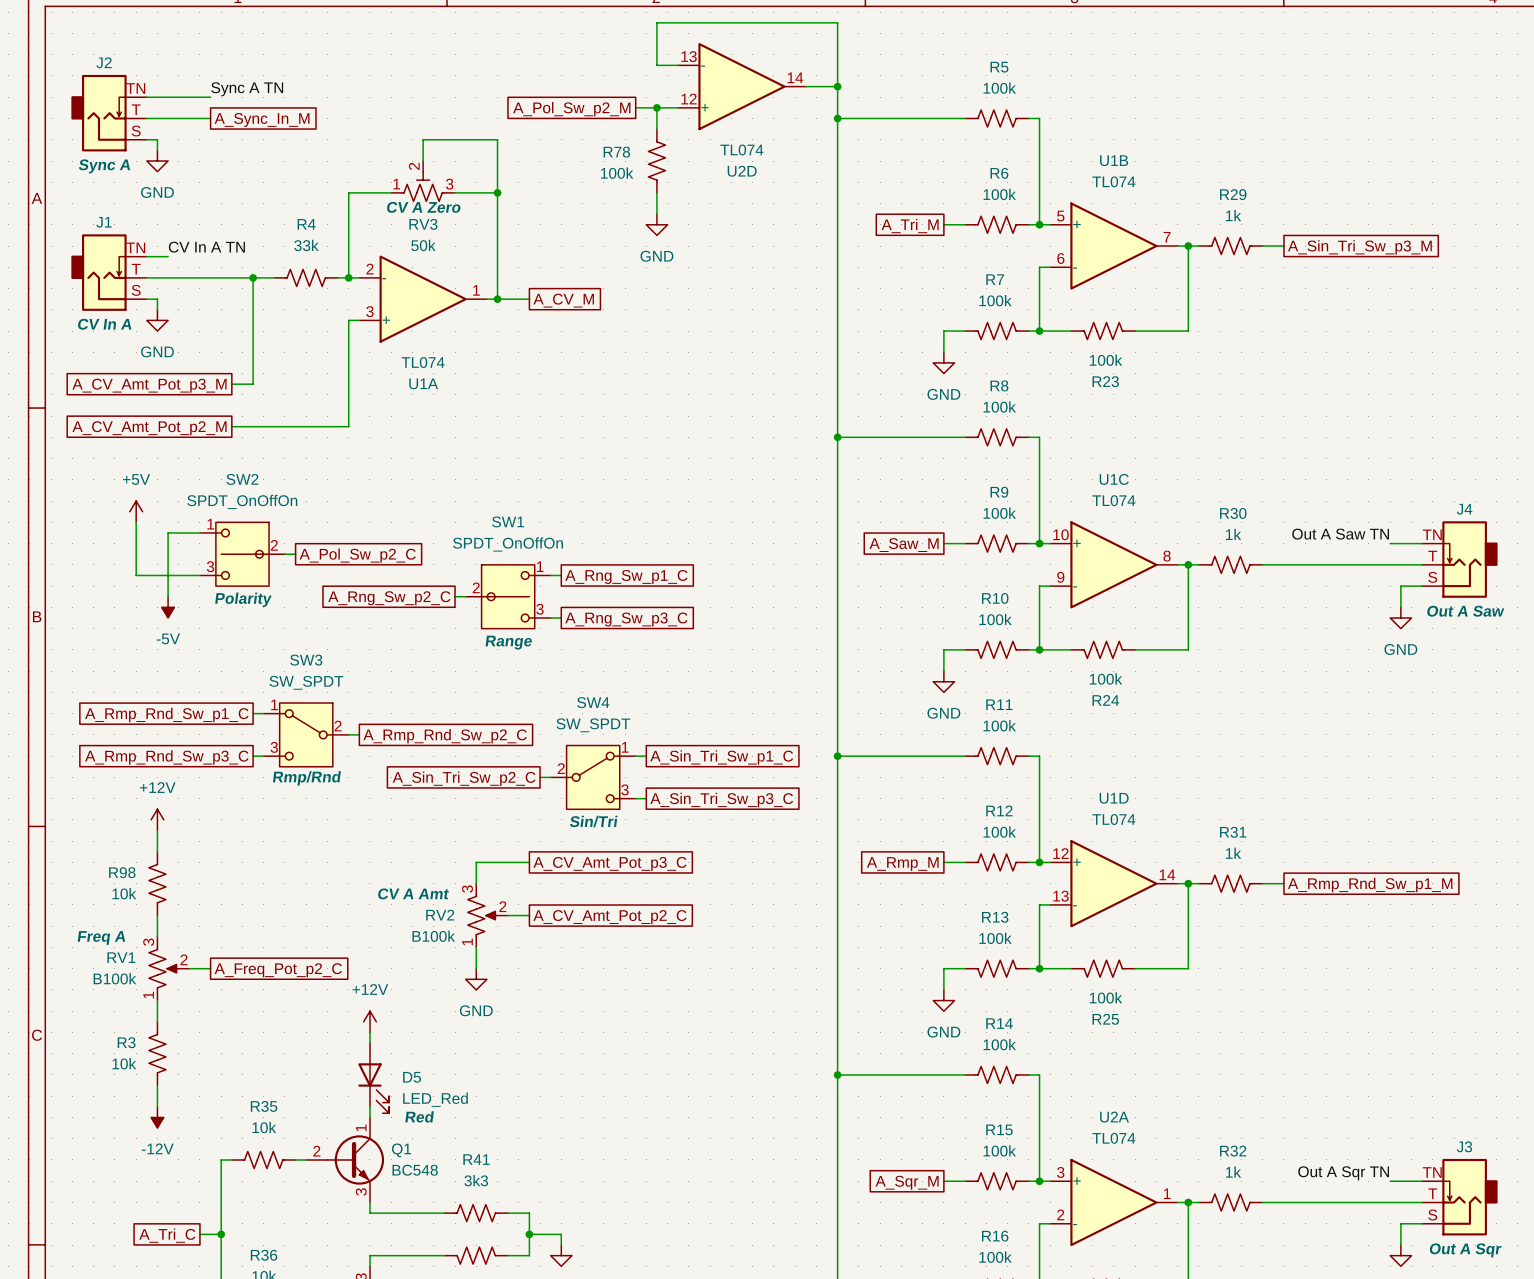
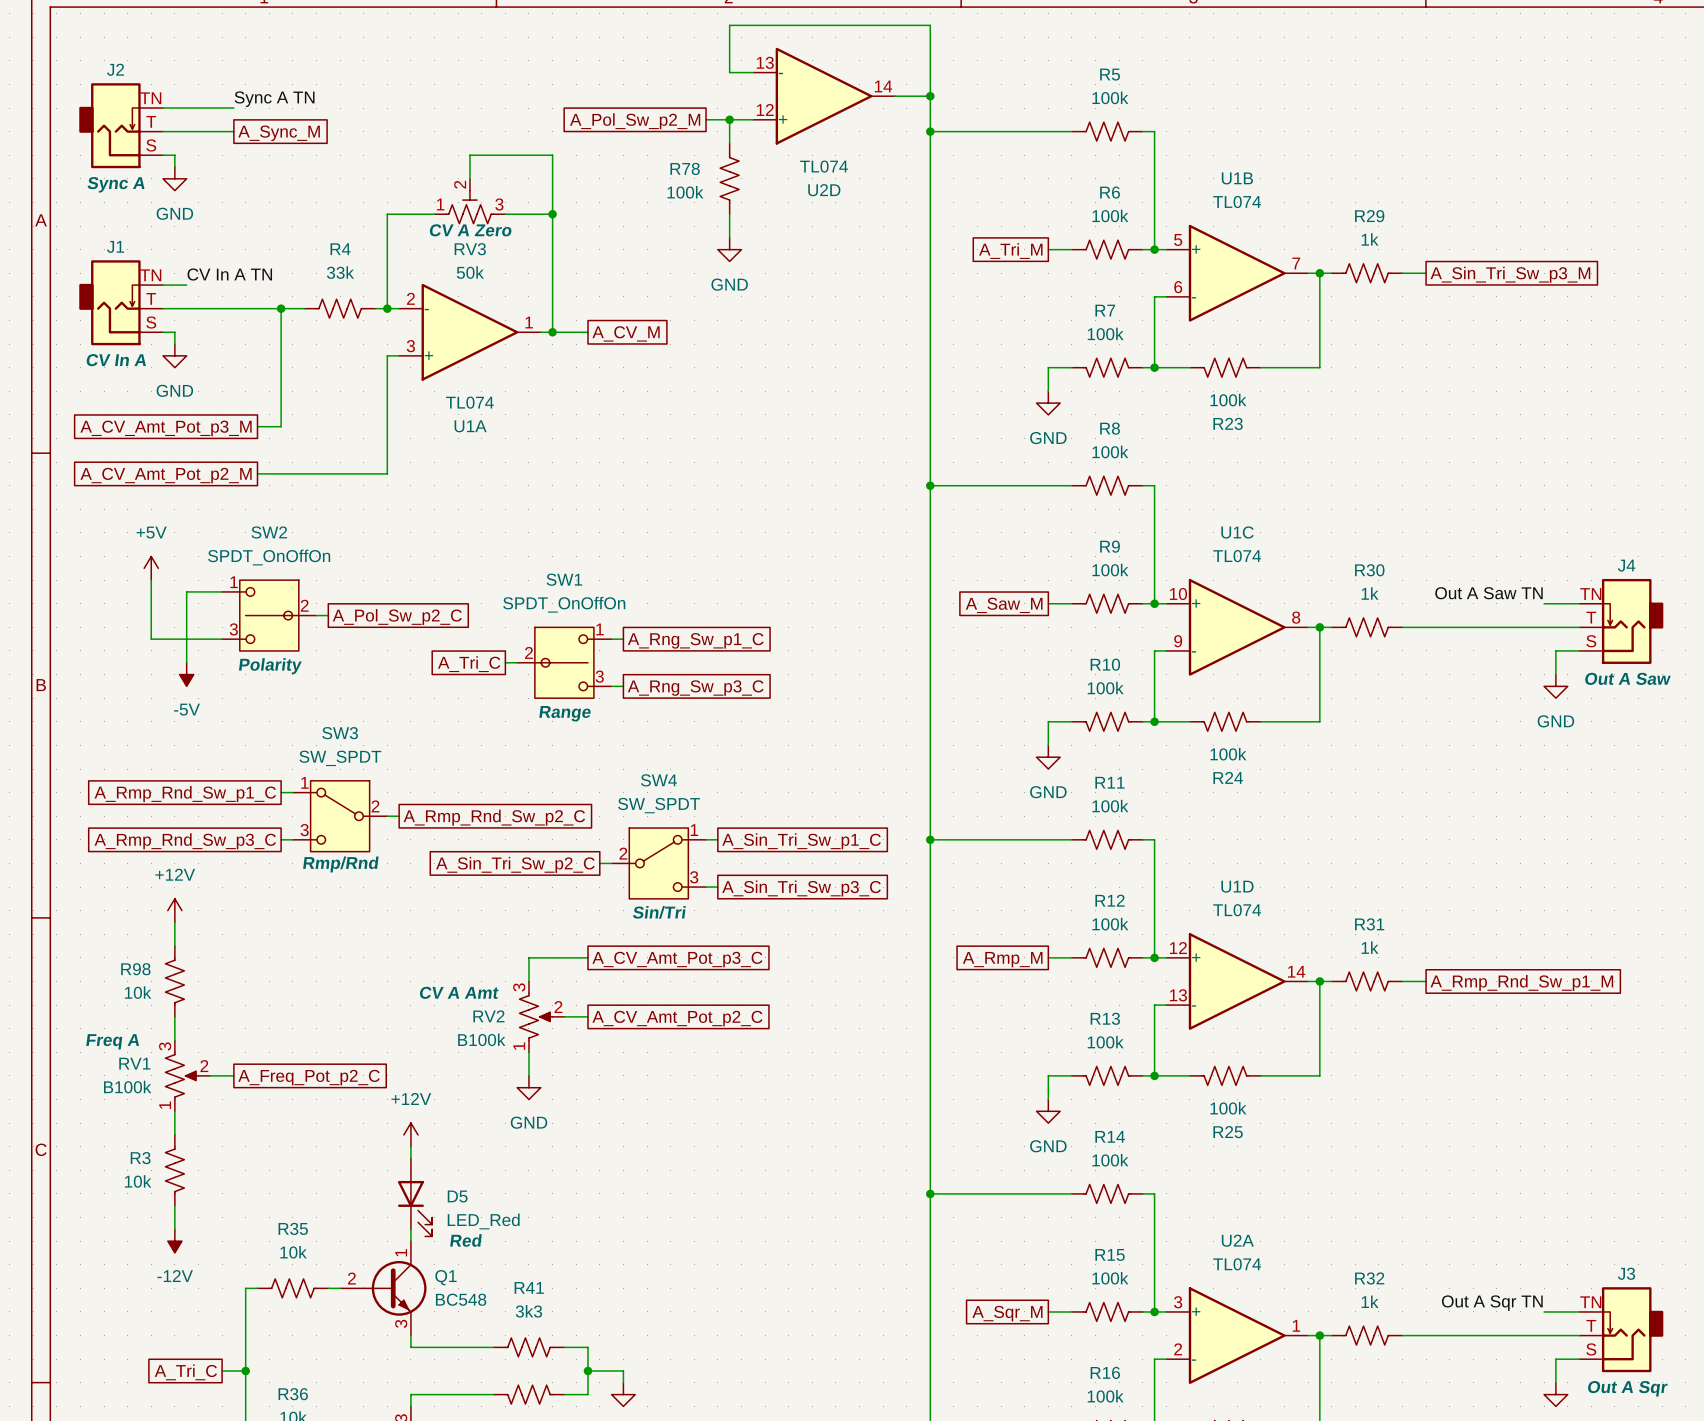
global label: A_Sync_In_M (262, 120) -> A_Sync_M (279, 133)
global label: A_Rng_Sw_p2_C (389, 598) -> A_Tri_C (469, 664)

